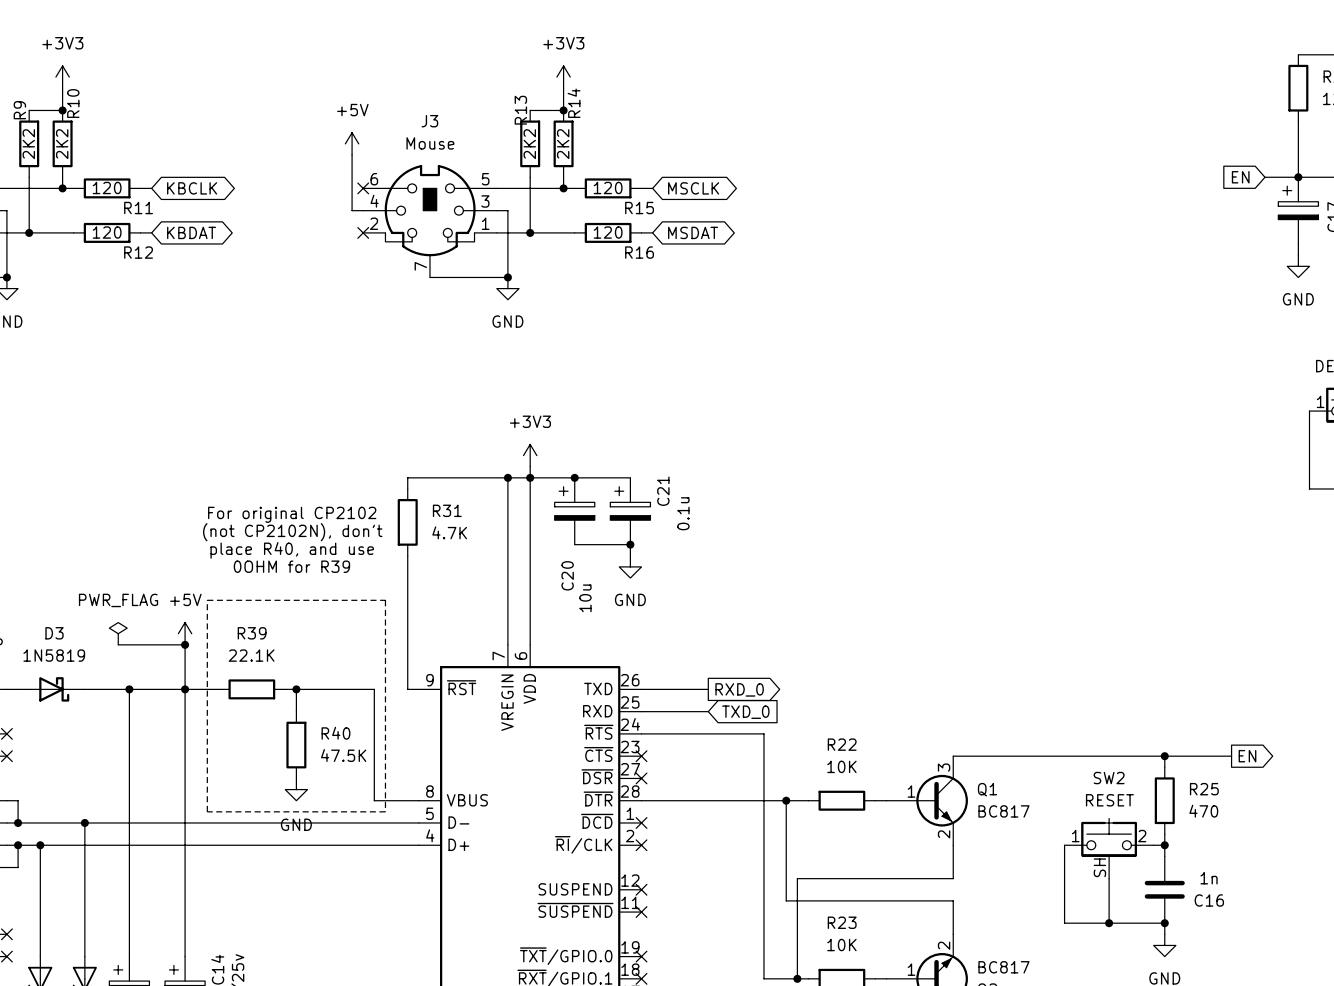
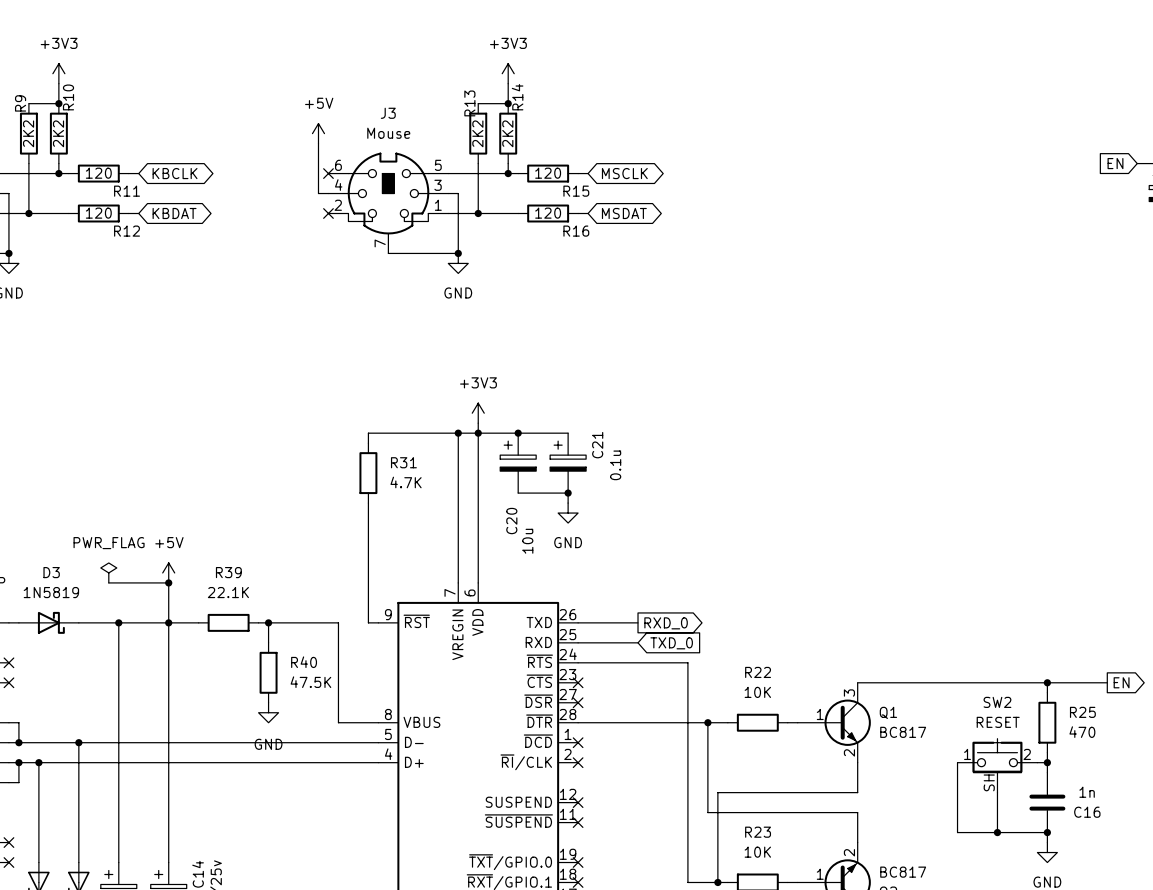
text: For original CP2102 (292, 514) -> none
text: (not CP2102N), don't (292, 532) -> none
text: place R40, and use (292, 550) -> none
text: 0OHM for R39 (291, 566) -> none
line: (207, 600) (385, 600) (385, 811) (207, 811) (207, 600) -> none

